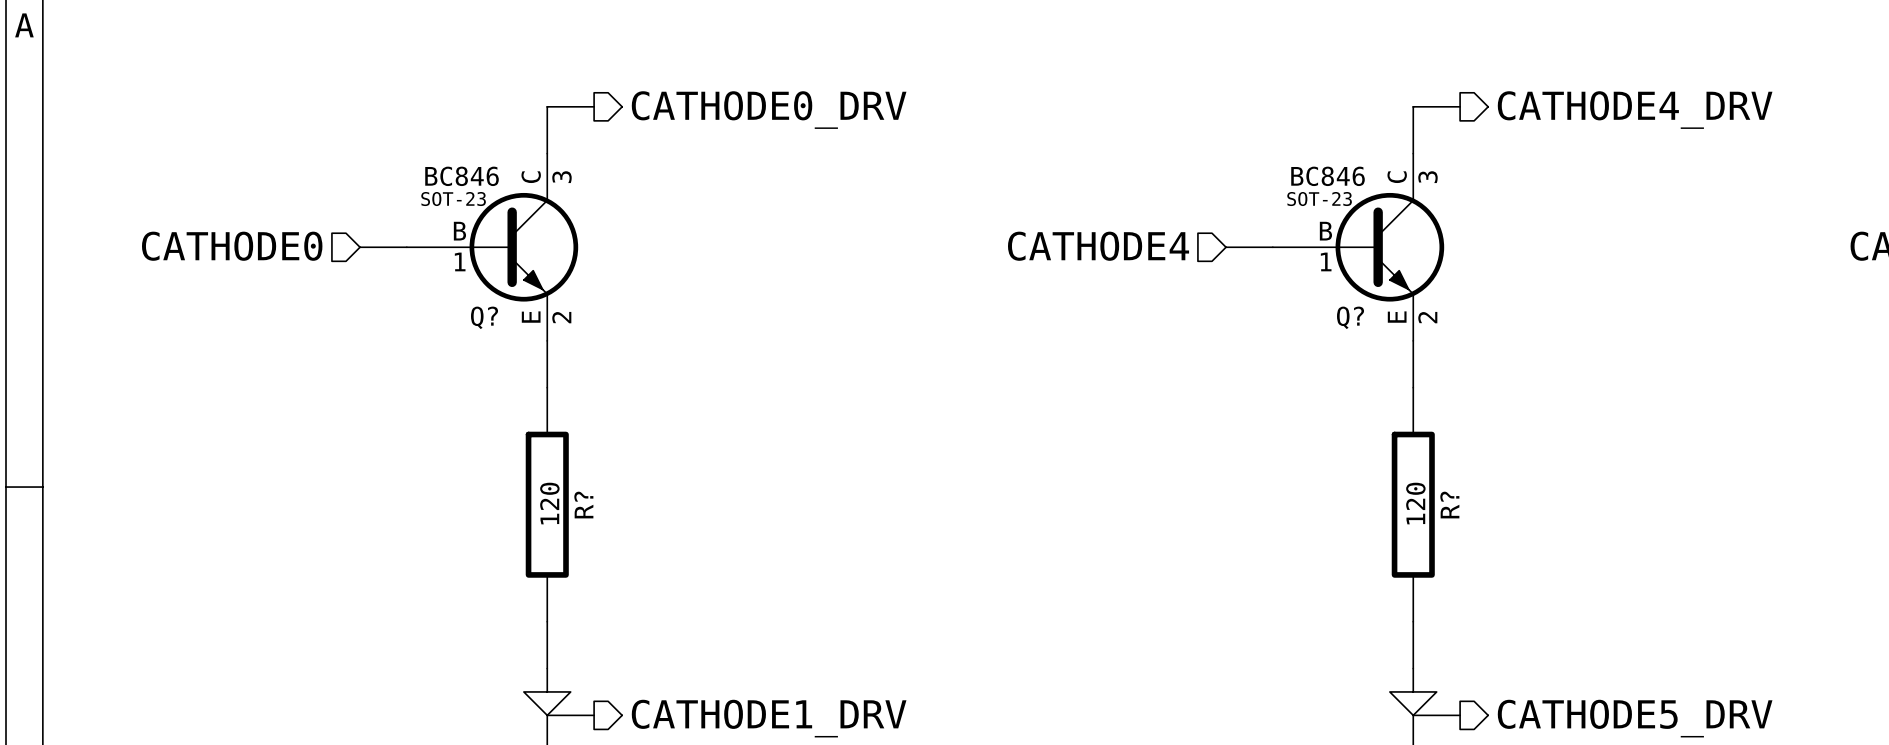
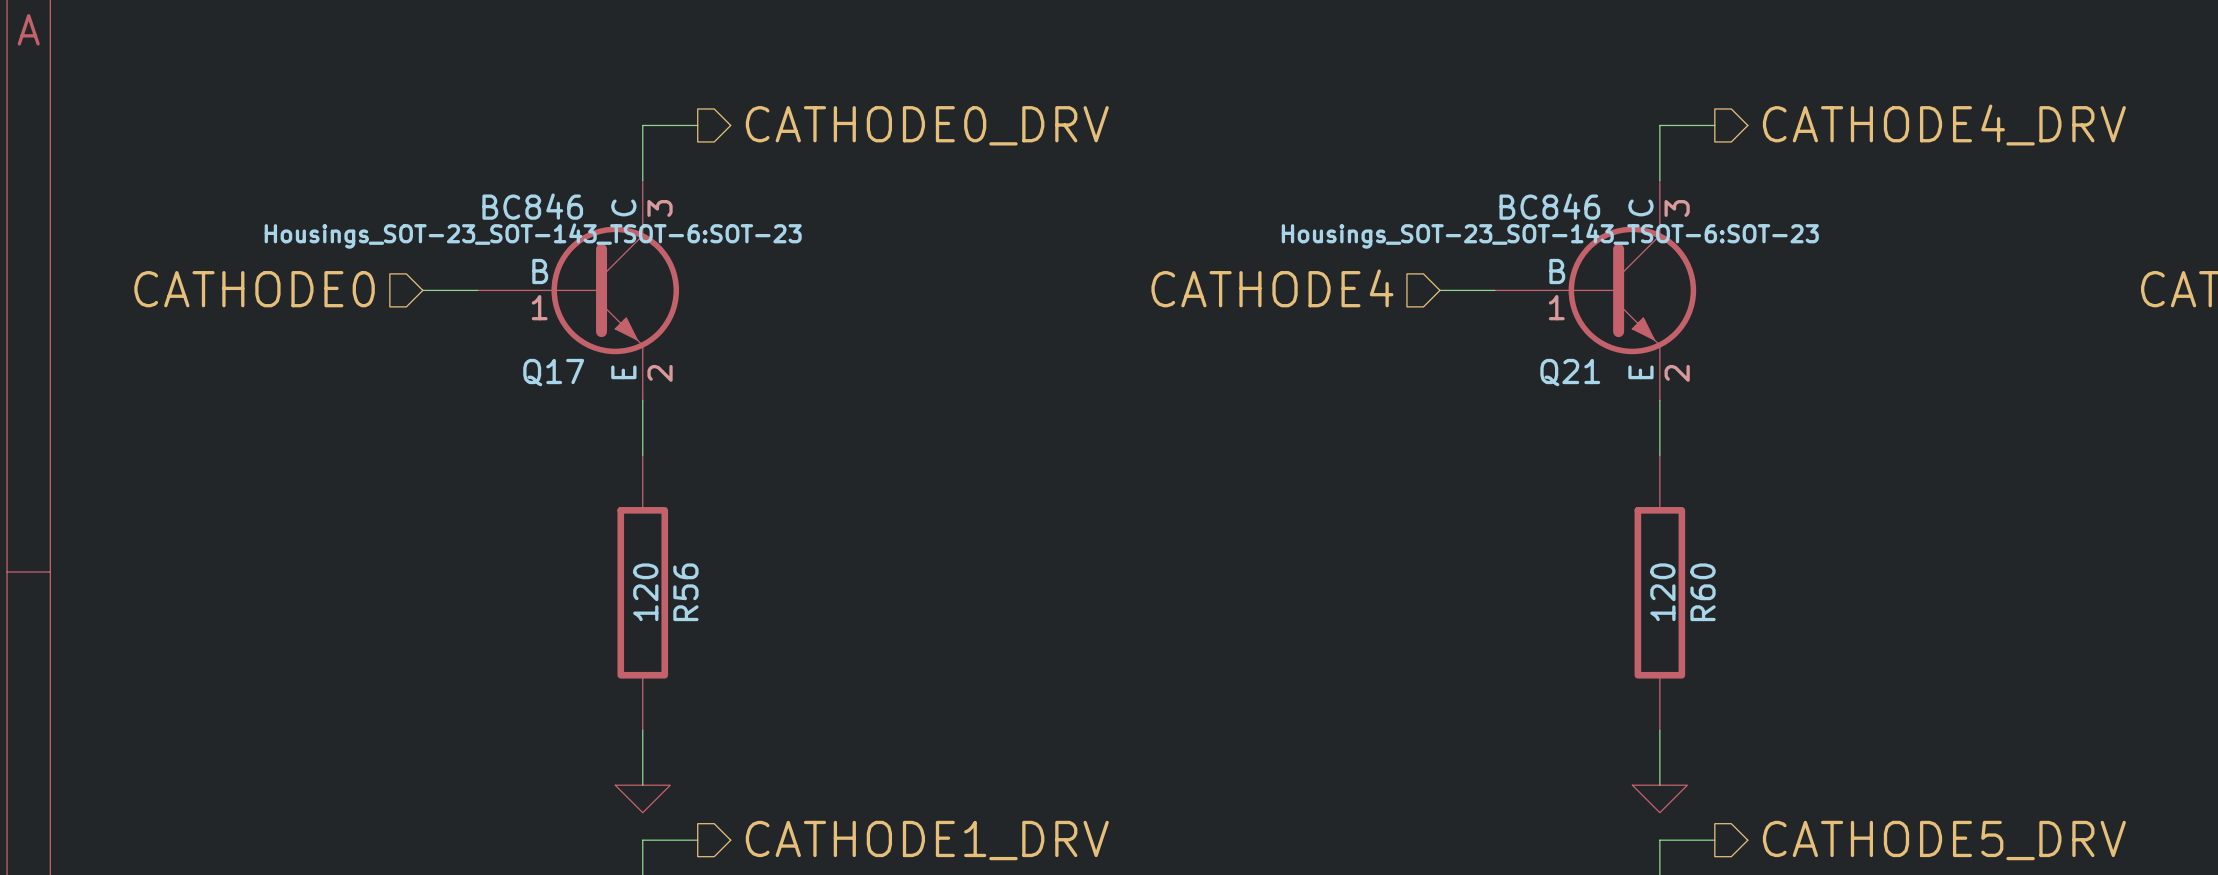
Q? text: SOT-23 (453, 199) -> Housings_SOT-23_SOT-143_TSOT-6:SOT-23 (533, 236)
Q? text: SOT-23 (1319, 199) -> Housings_SOT-23_SOT-143_TSOT-6:SOT-23 (1550, 236)
Q? name: Q? (484, 317) -> Q17 (553, 372)
Q? name: Q? (1350, 317) -> Q21 (1570, 372)
R? name: R? (583, 505) -> R56 (685, 592)
R? name: R? (1449, 505) -> R60 (1703, 592)
power symbol shape: [523, 668, 571, 716] -> [615, 785, 671, 813]
power symbol shape: [1389, 668, 1437, 716] -> [1632, 785, 1688, 813]

